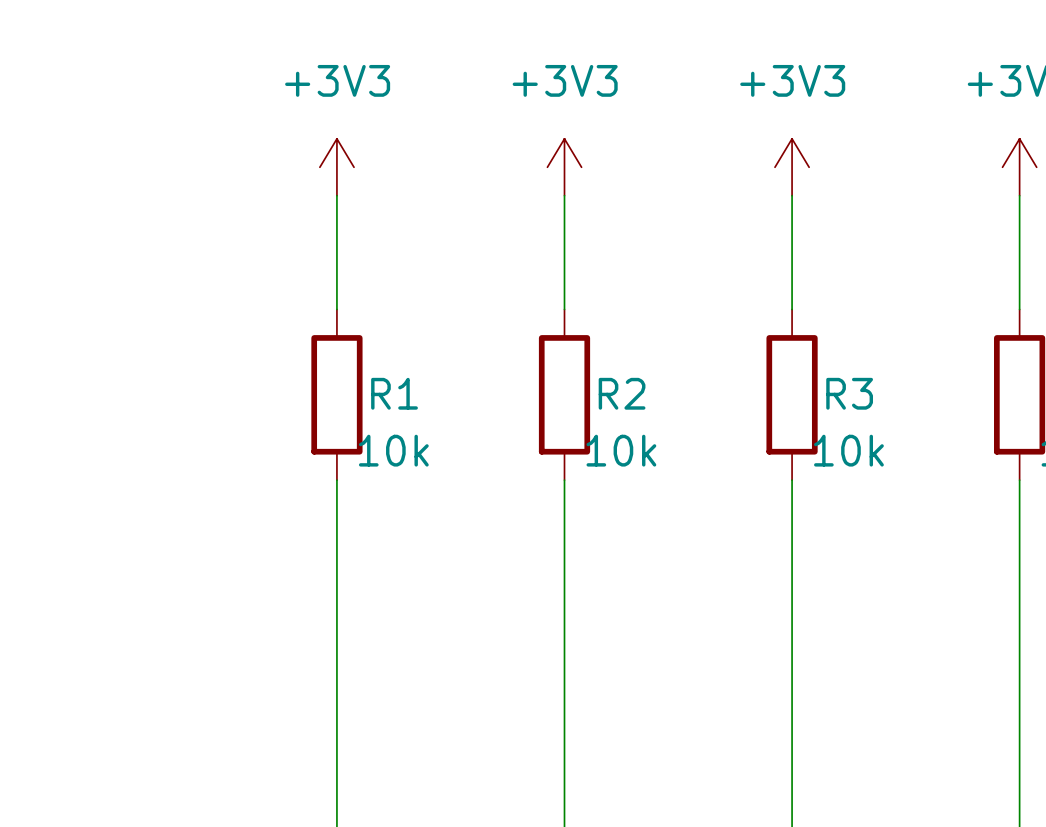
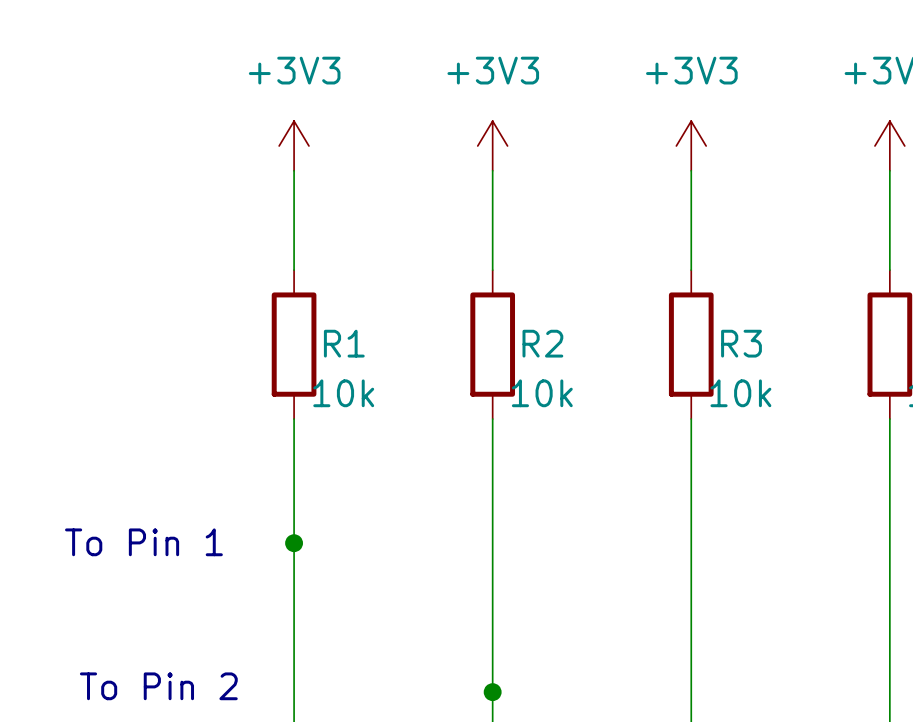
text: none -> To Pin 1 (143, 542)
junction: none -> (294, 543)
text: none -> To Pin 2 (158, 686)
junction: none -> (492, 692)

